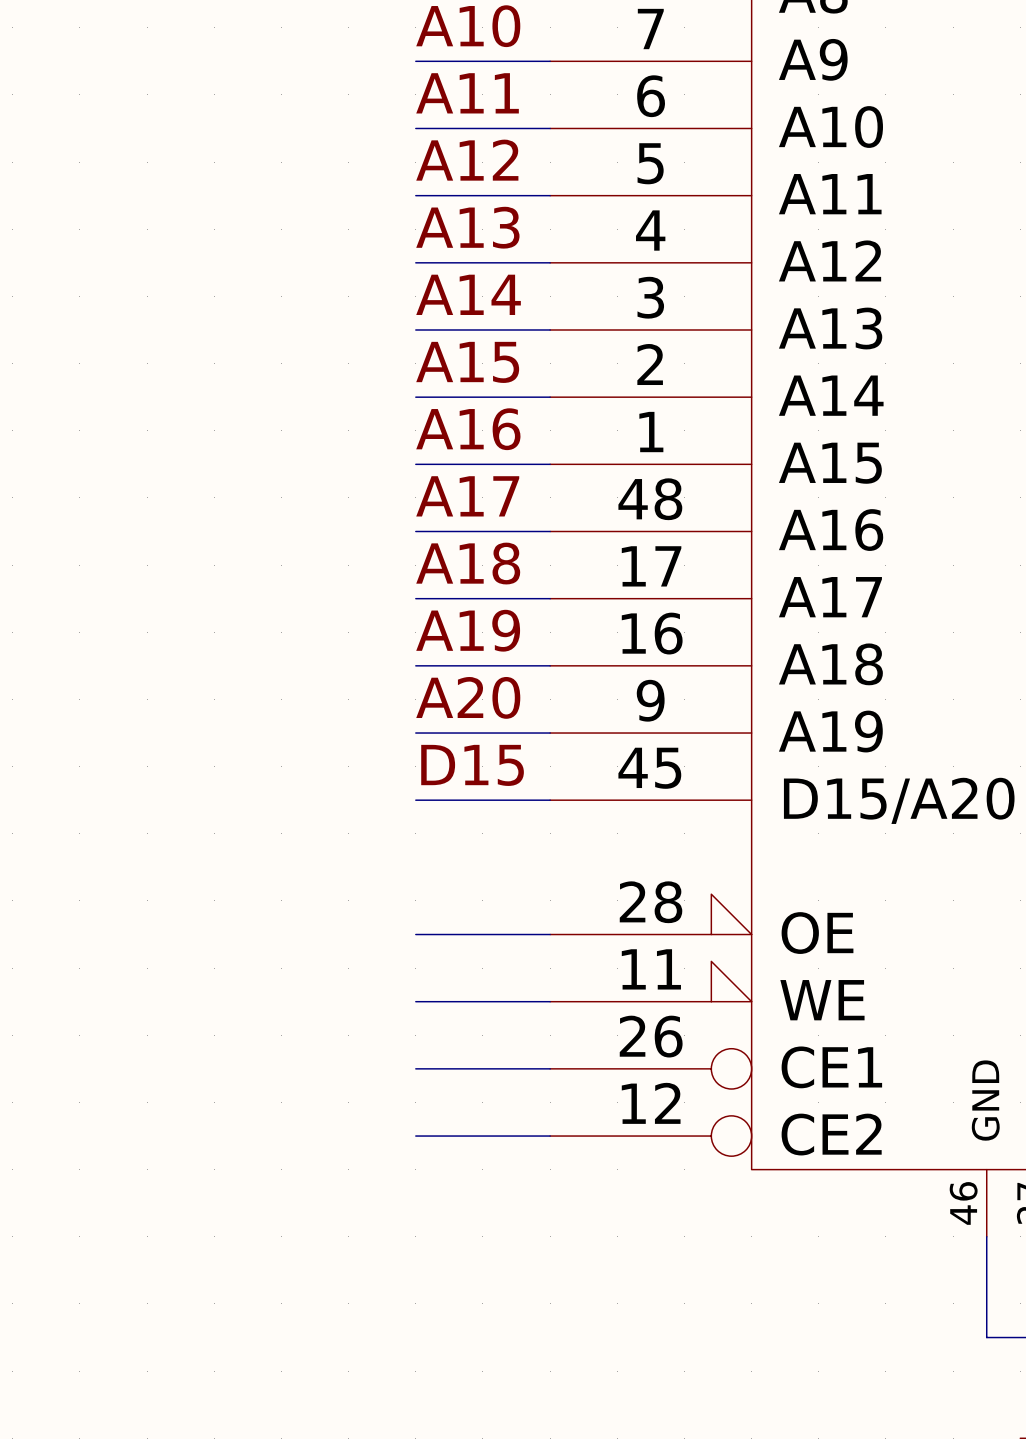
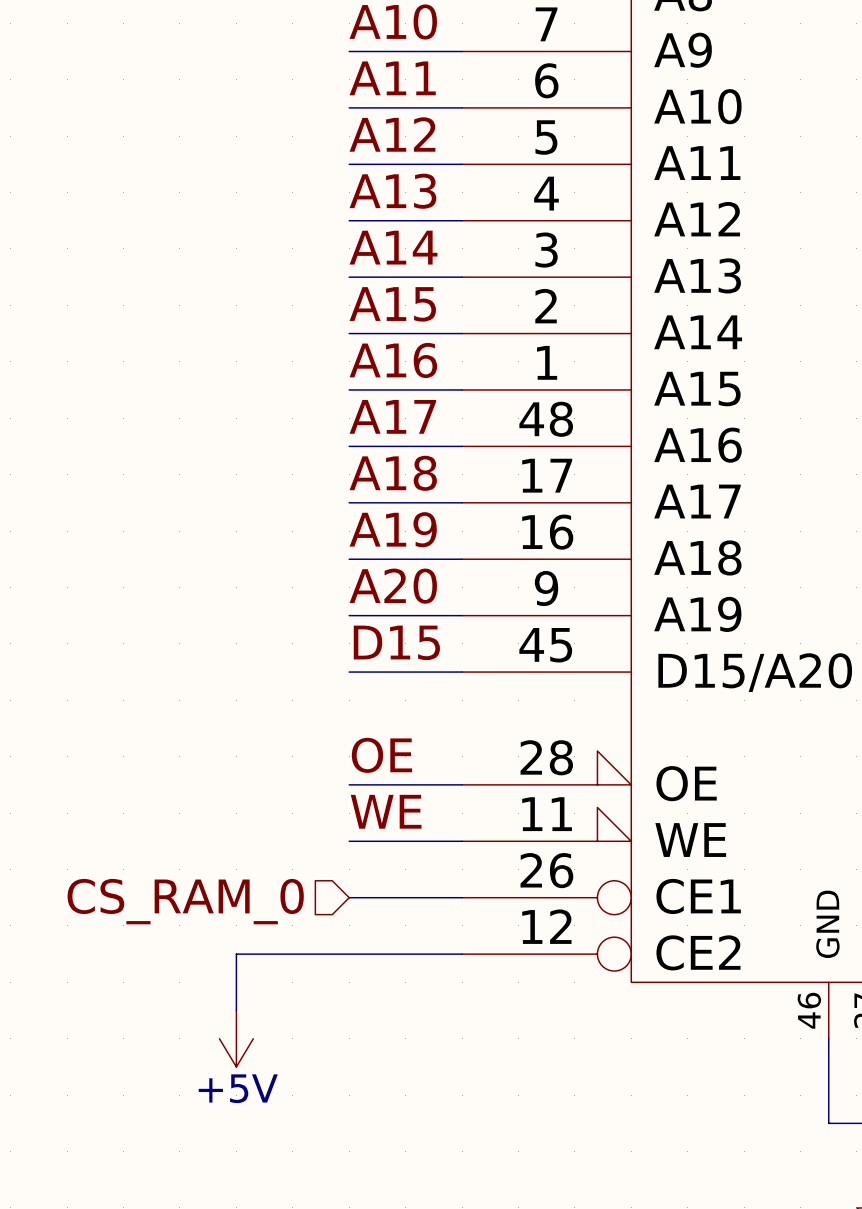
label: none -> OE (381, 755)
label: none -> WE (386, 811)
hierarchical label: none -> CS_RAM_0 (185, 901)
wire: none -> (349, 954) (236, 954) (236, 1010)
power symbol: none -> +5V (236, 1038)

